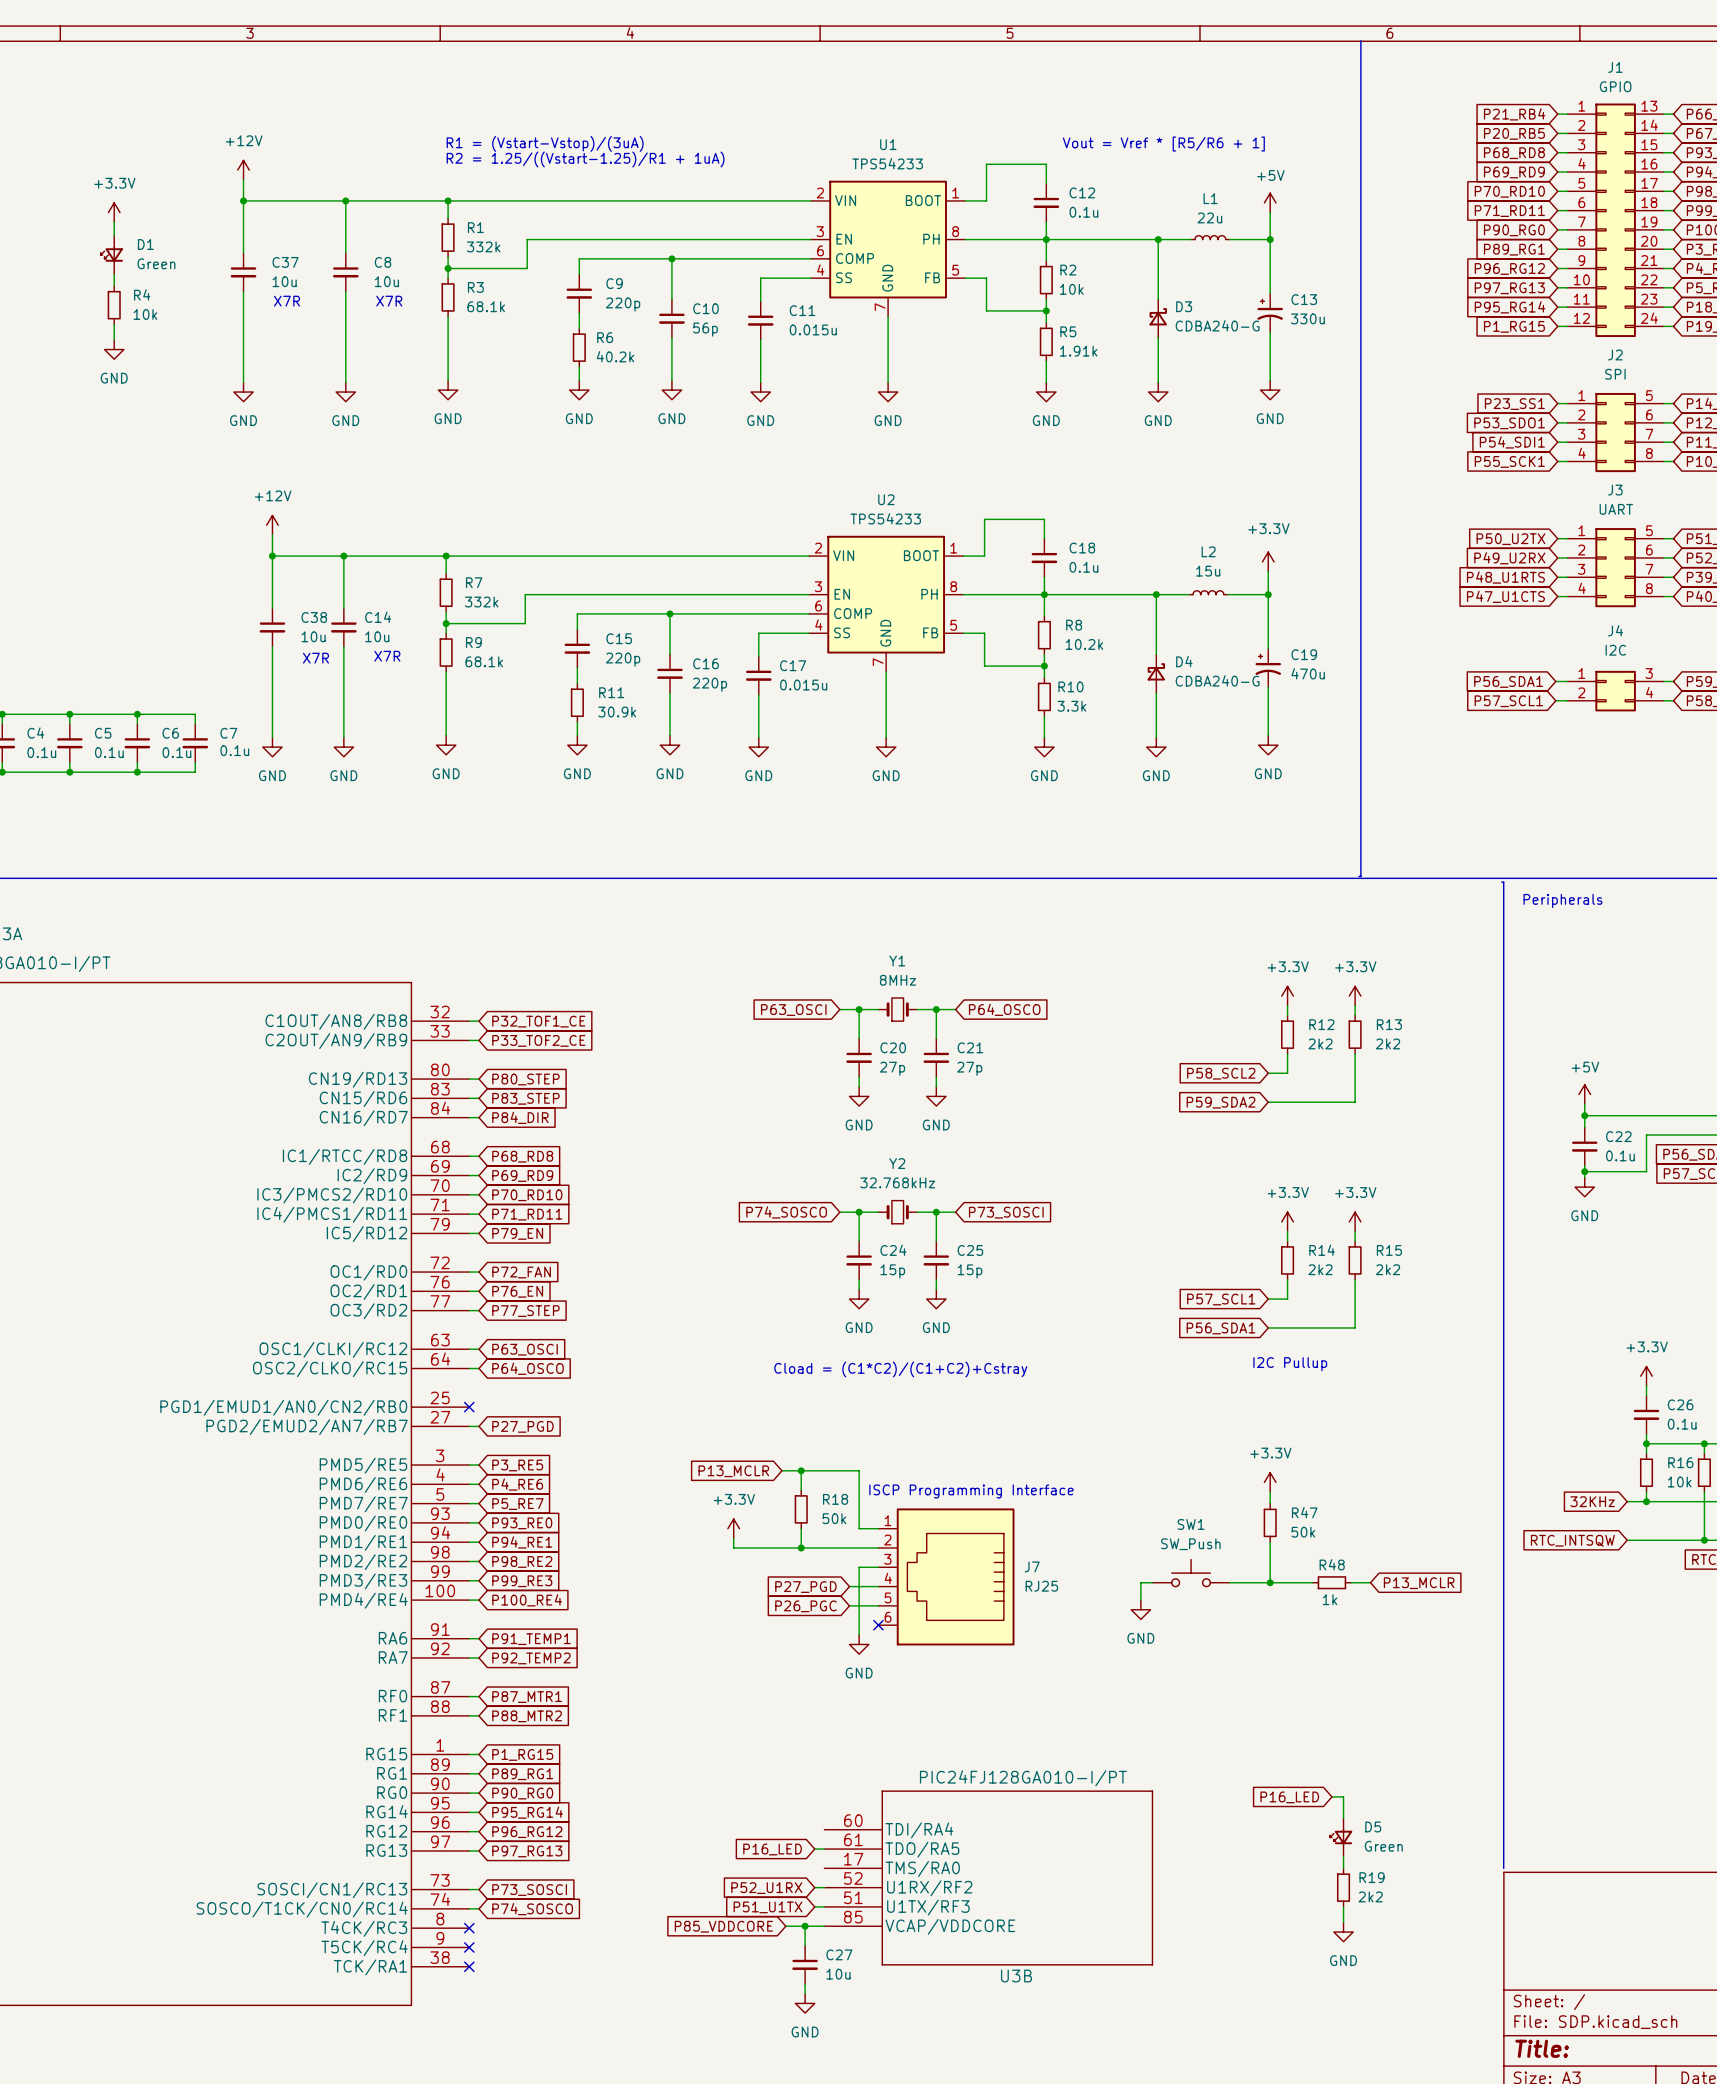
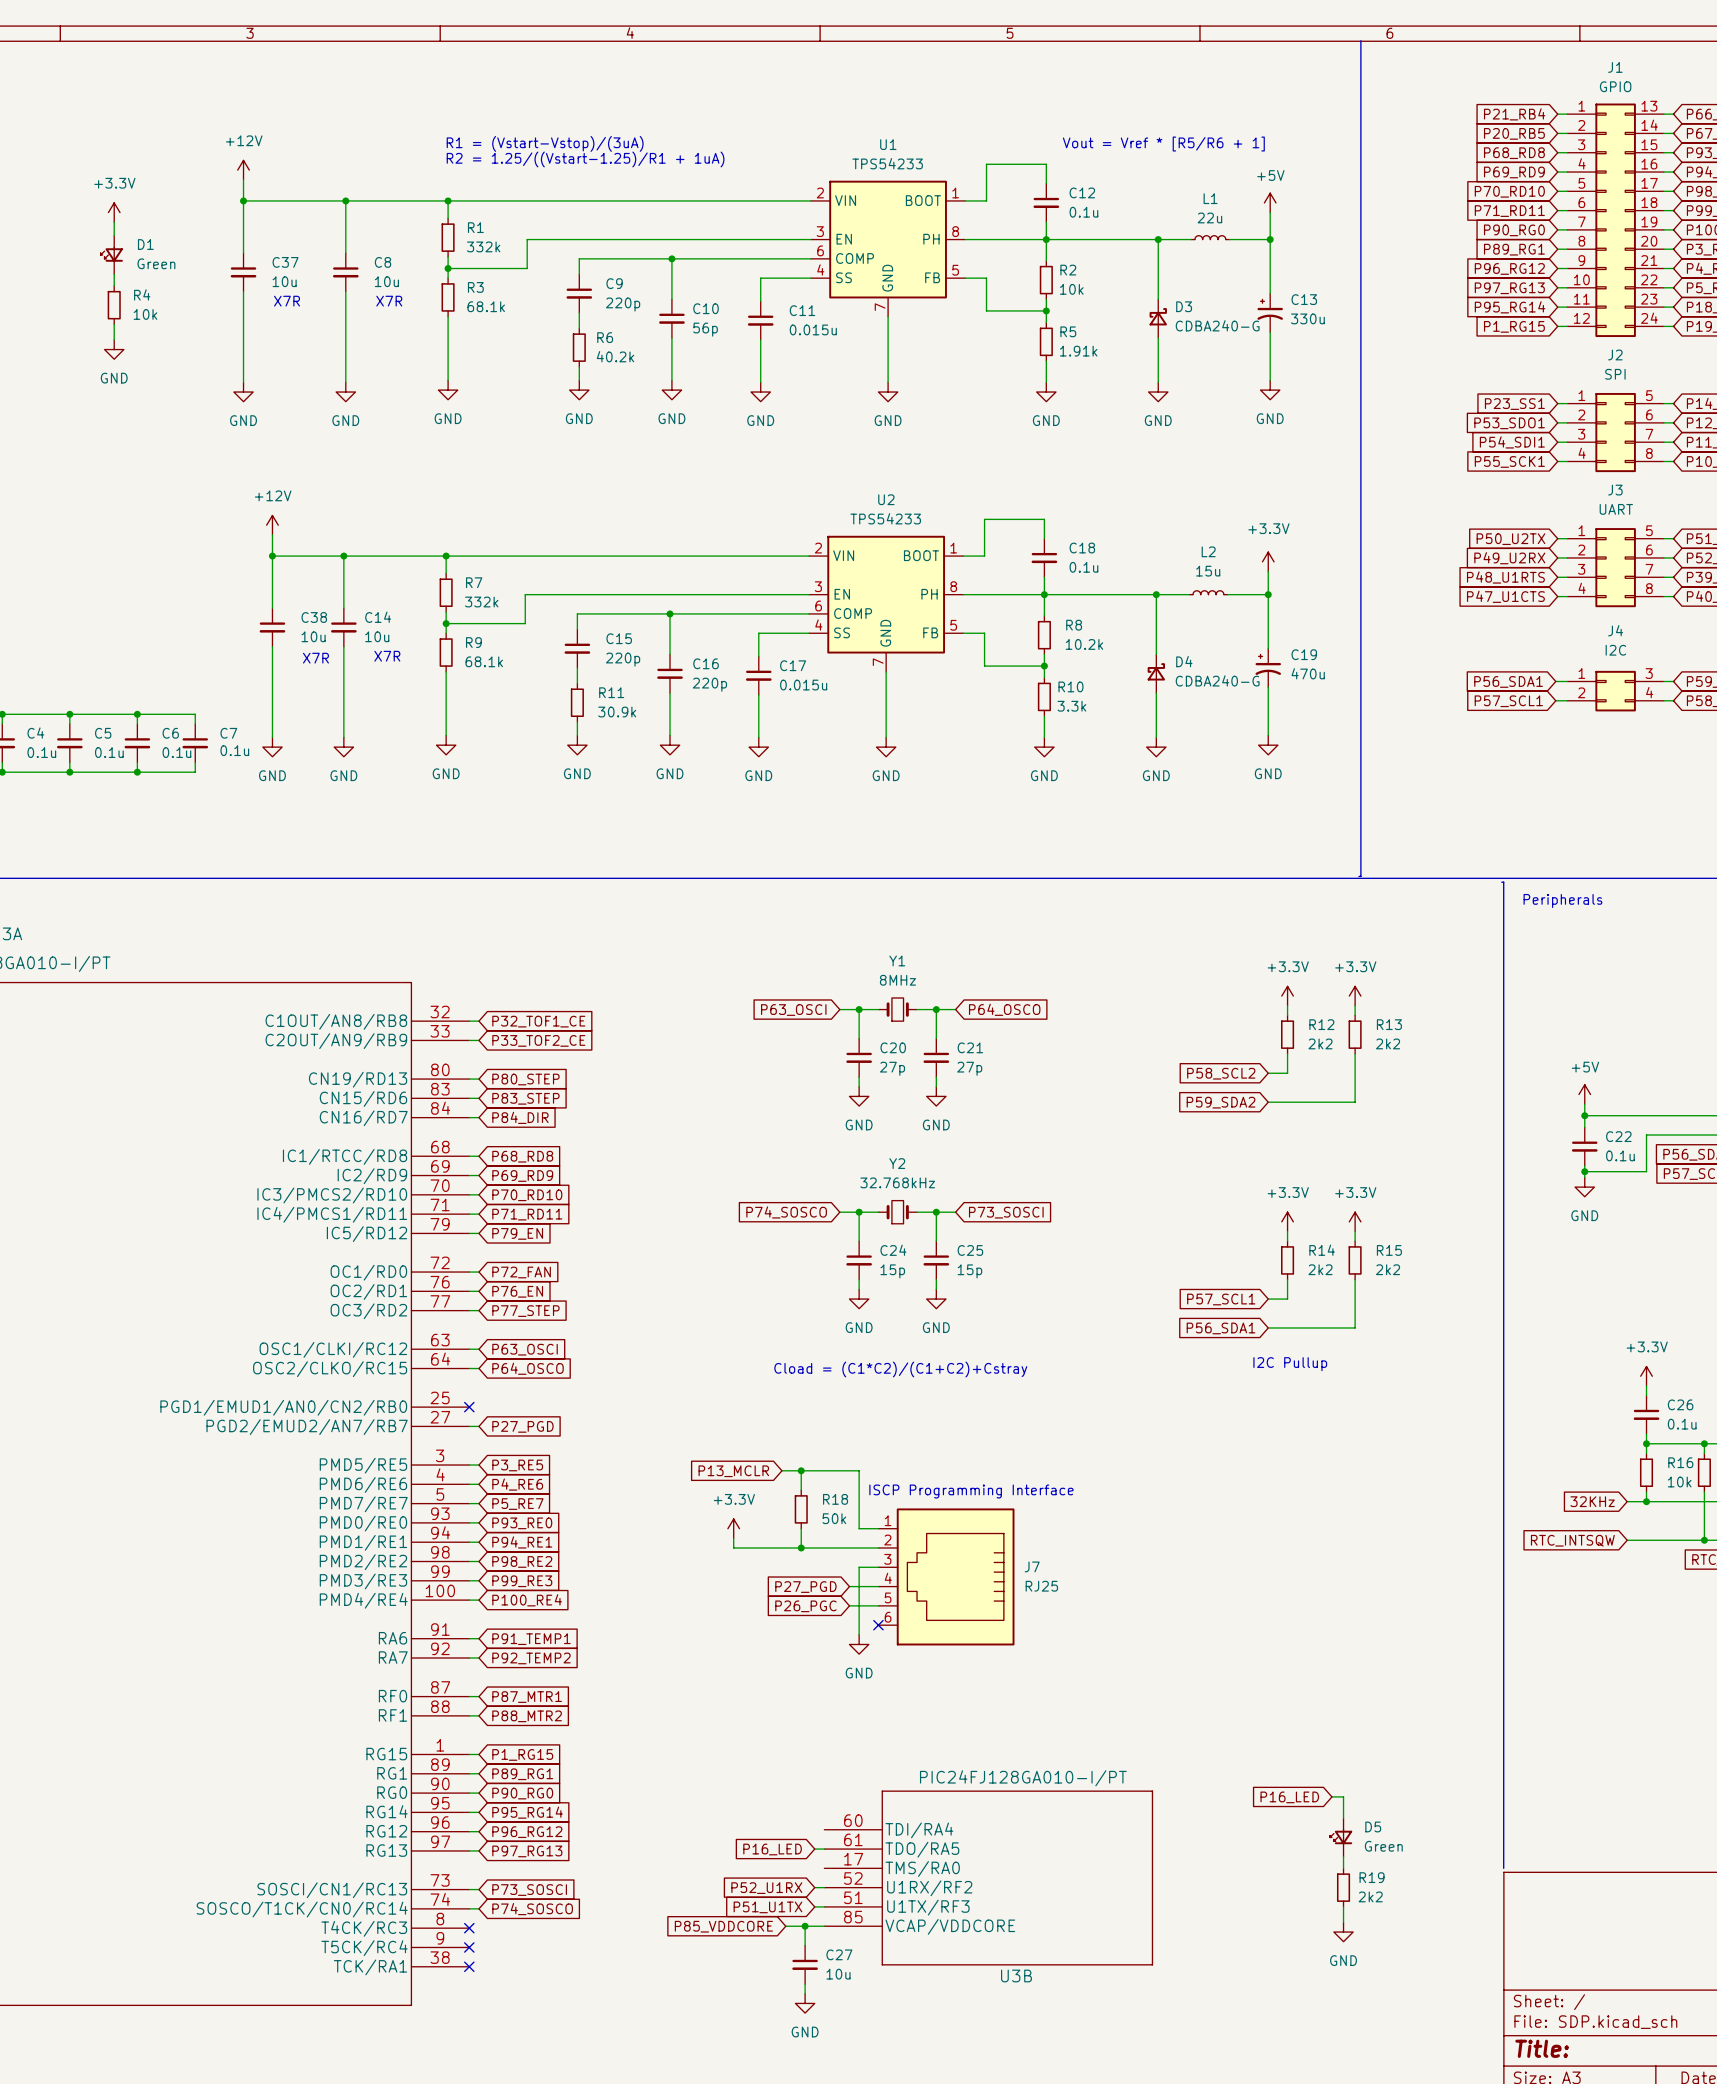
power symbol: +3.3V (1270, 1482) -> none
wire: (1270, 1492) (1270, 1503) -> none
R47: 50k (1270, 1522) -> none
wire: (1270, 1542) (1270, 1582) -> none
SW1: SW_Push (1191, 1573) -> none
wire: (1152, 1582) (1140, 1582) (1140, 1600) -> none
wire: (1229, 1582) (1312, 1582) -> none
junction: (1270, 1582) -> none
R48: 1k (1331, 1582) -> none
wire: (1351, 1582) (1370, 1582) -> none
global label: P13_MCLR (1419, 1583) -> none
power symbol: GND (1140, 1609) -> none

